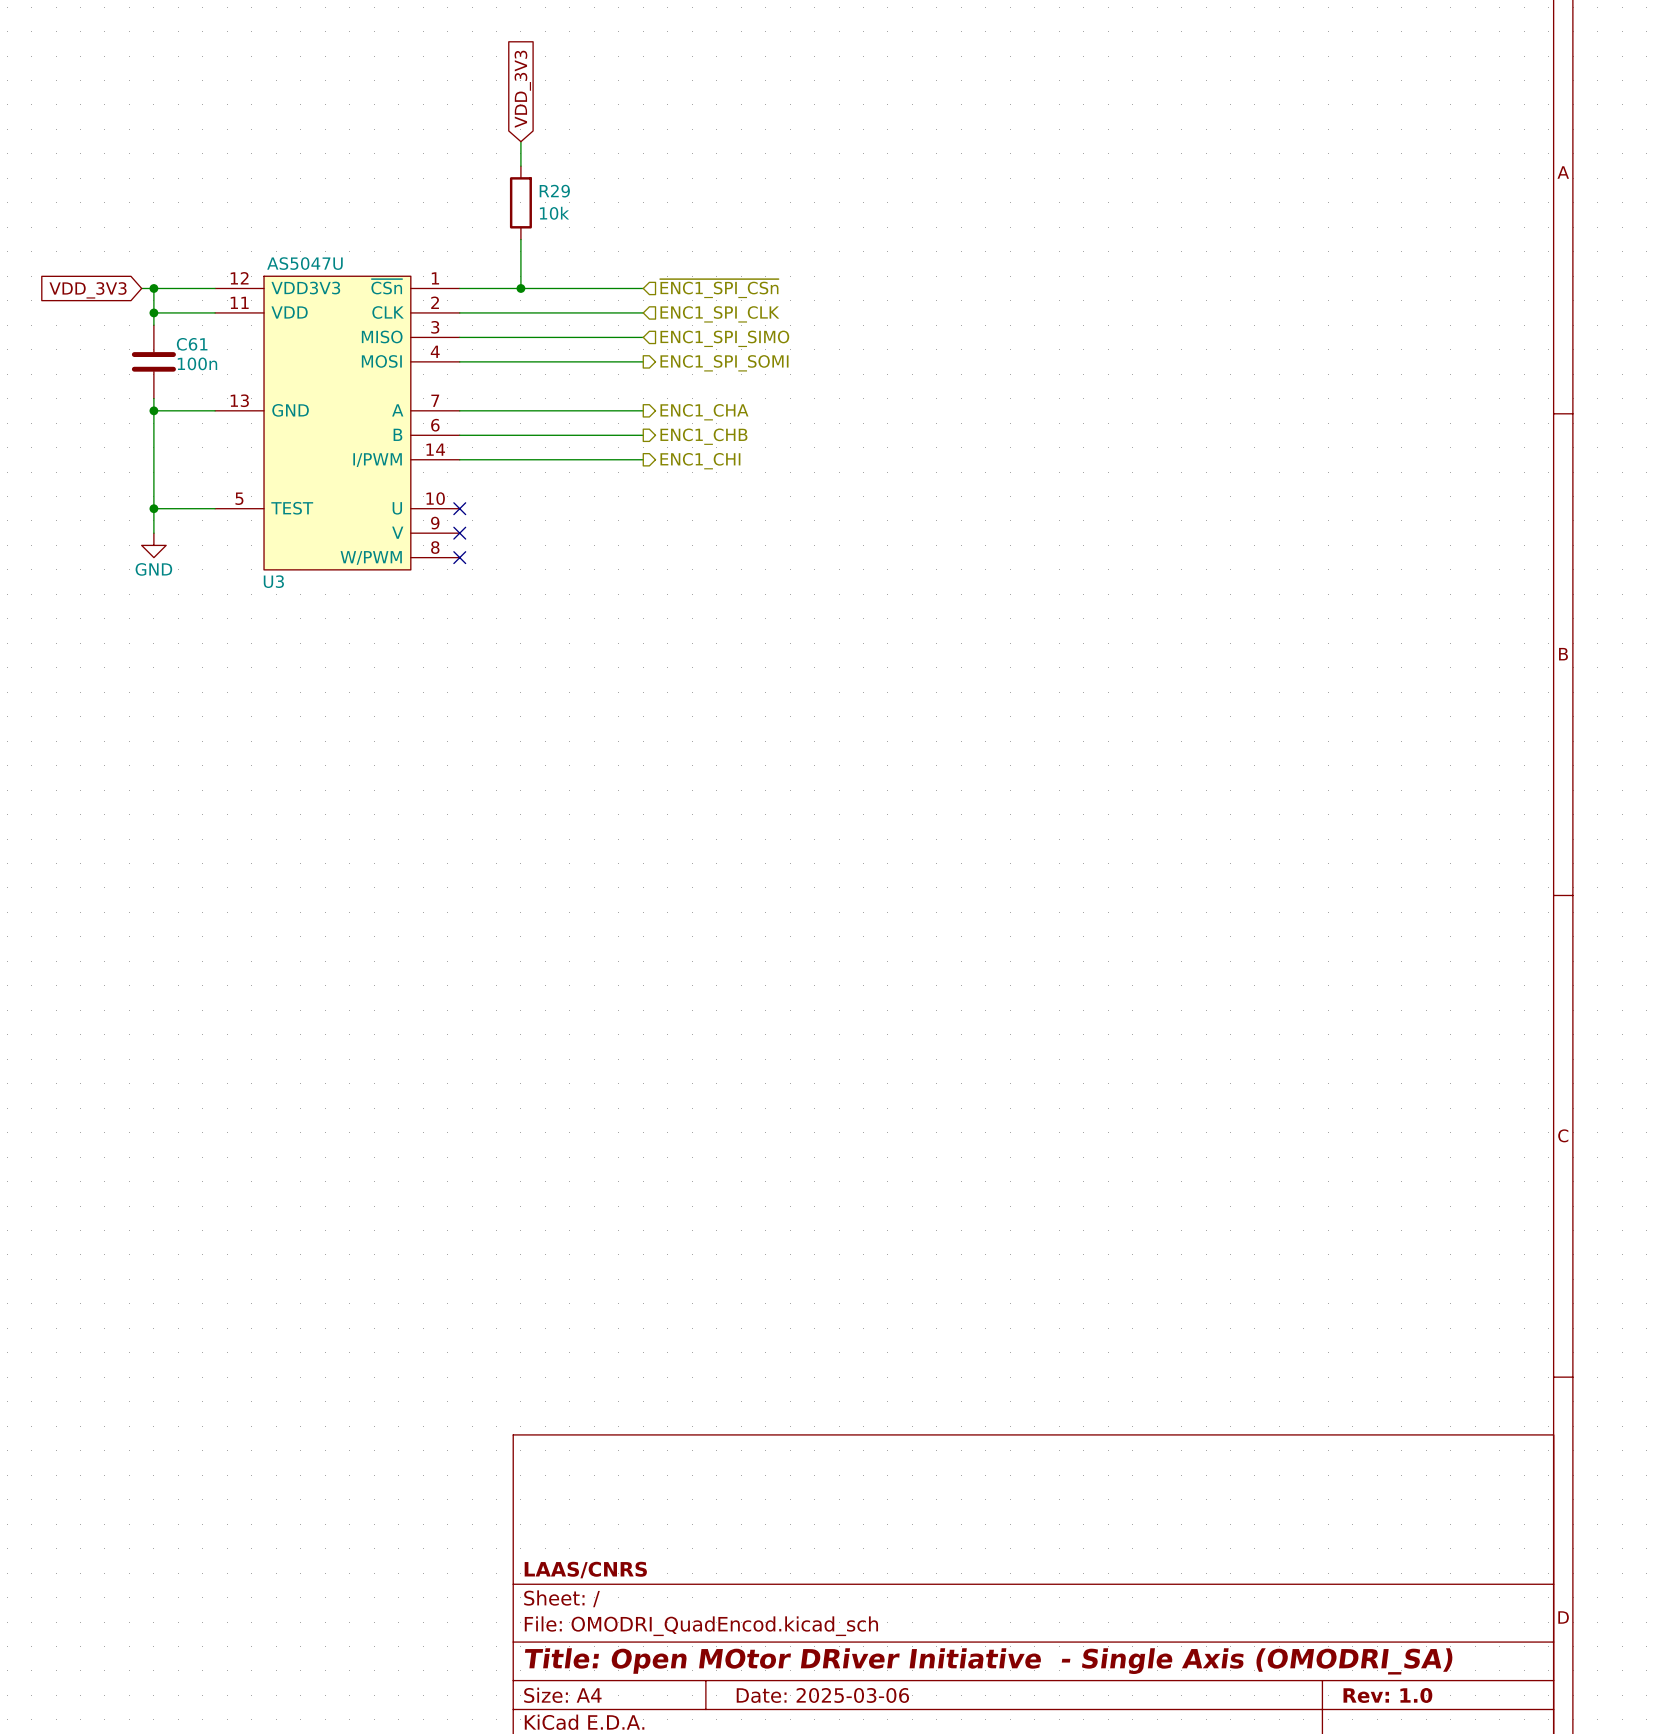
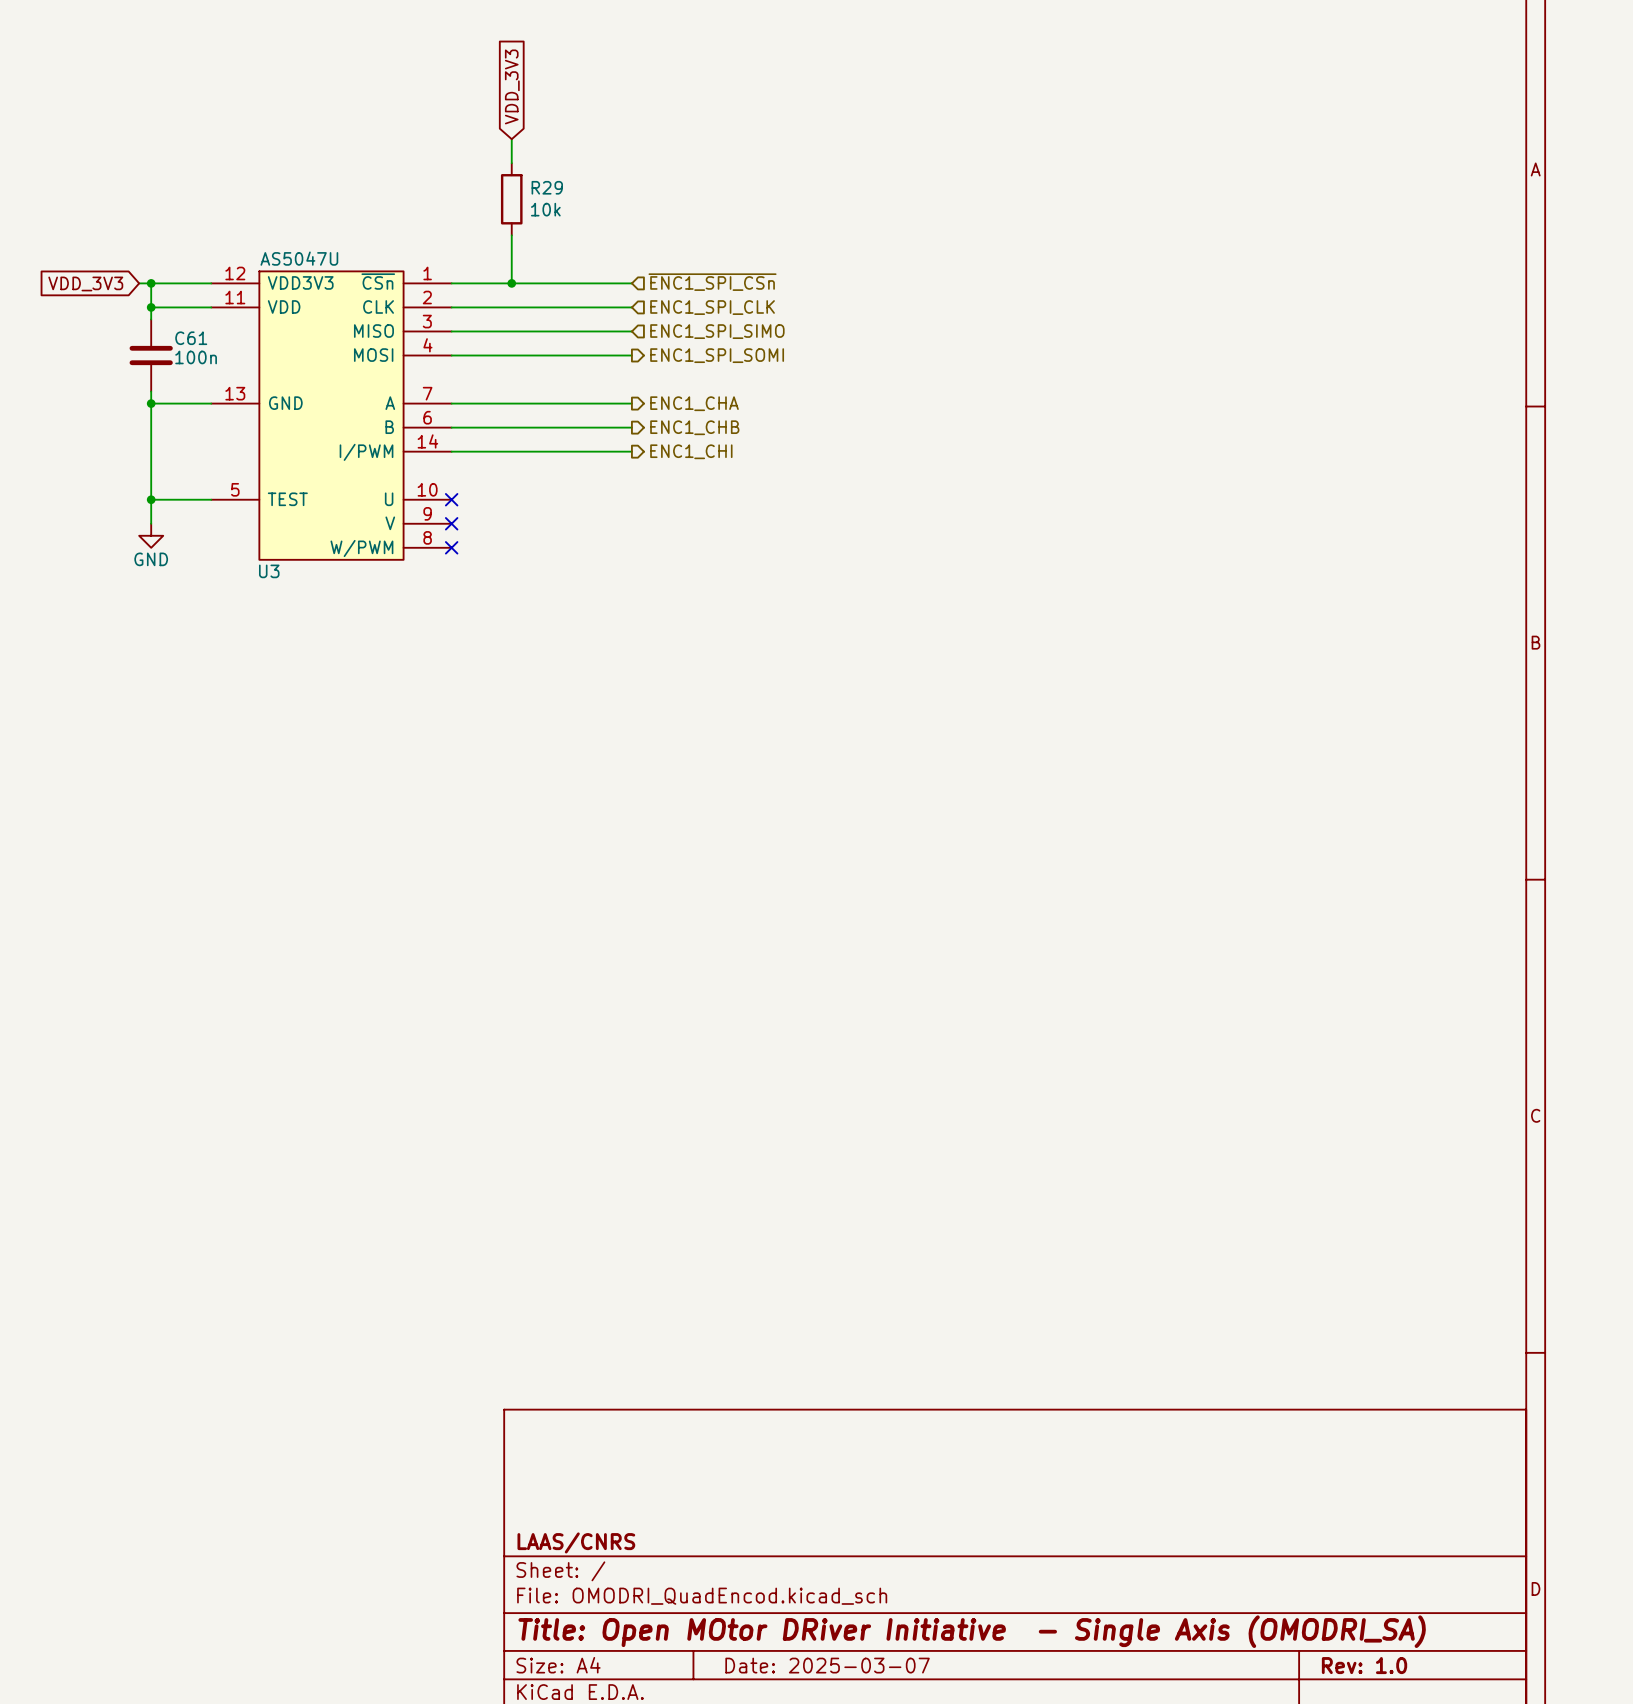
title block: Date: 2025-03-06 (822, 1695) -> Date: 2025-03-07 (827, 1665)

